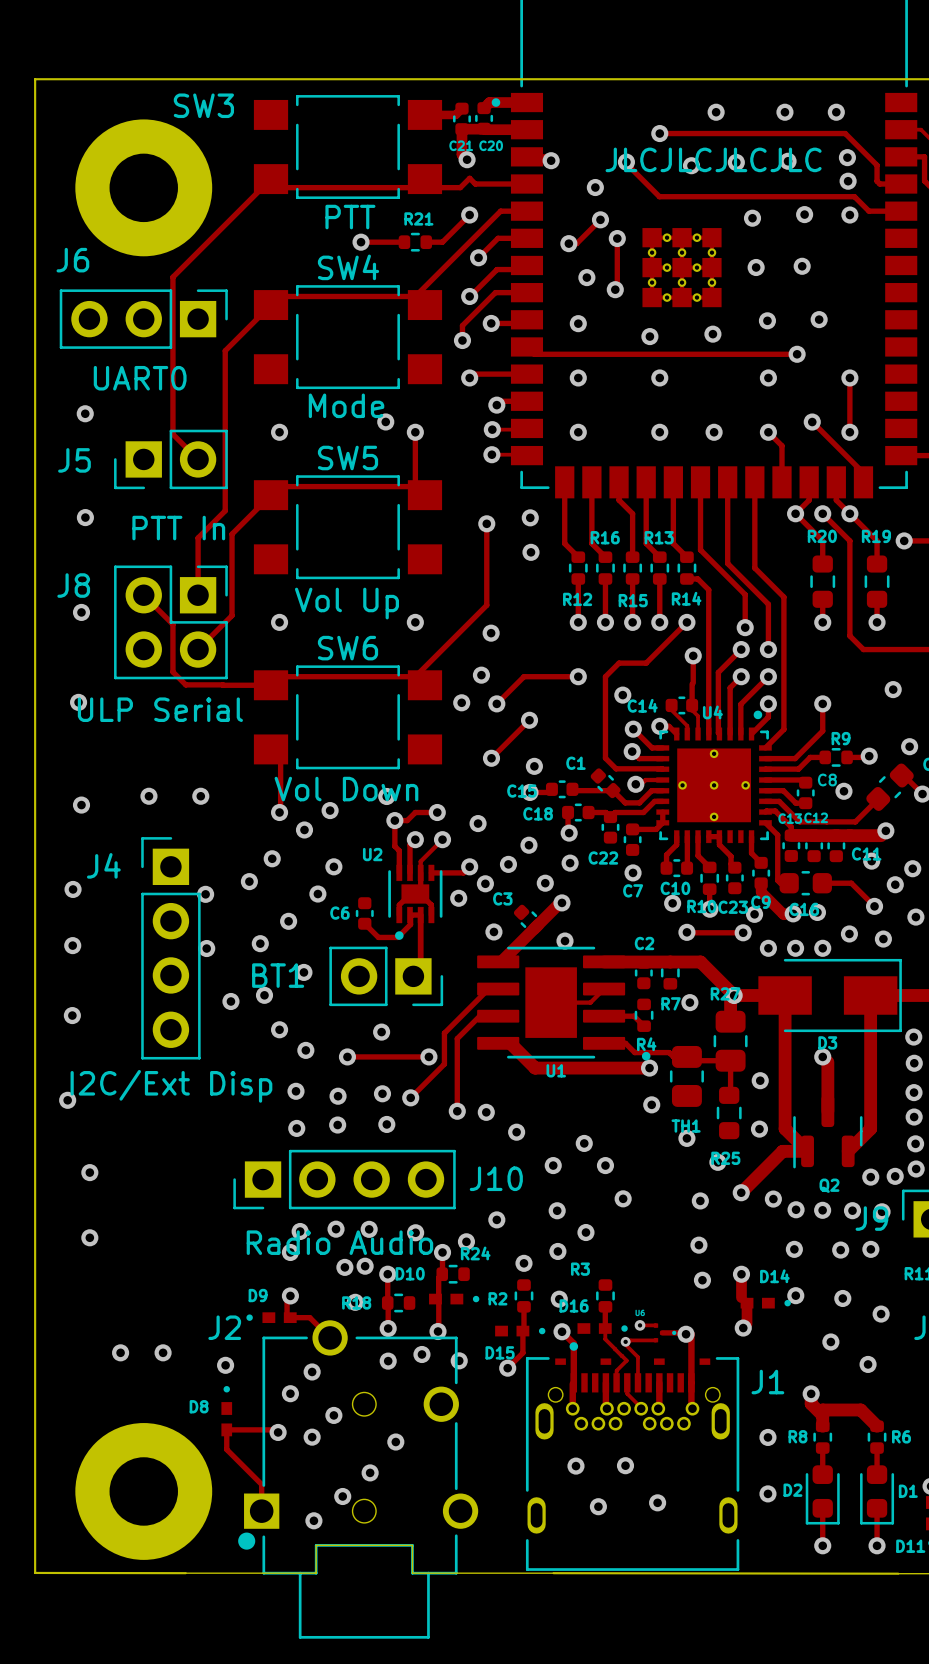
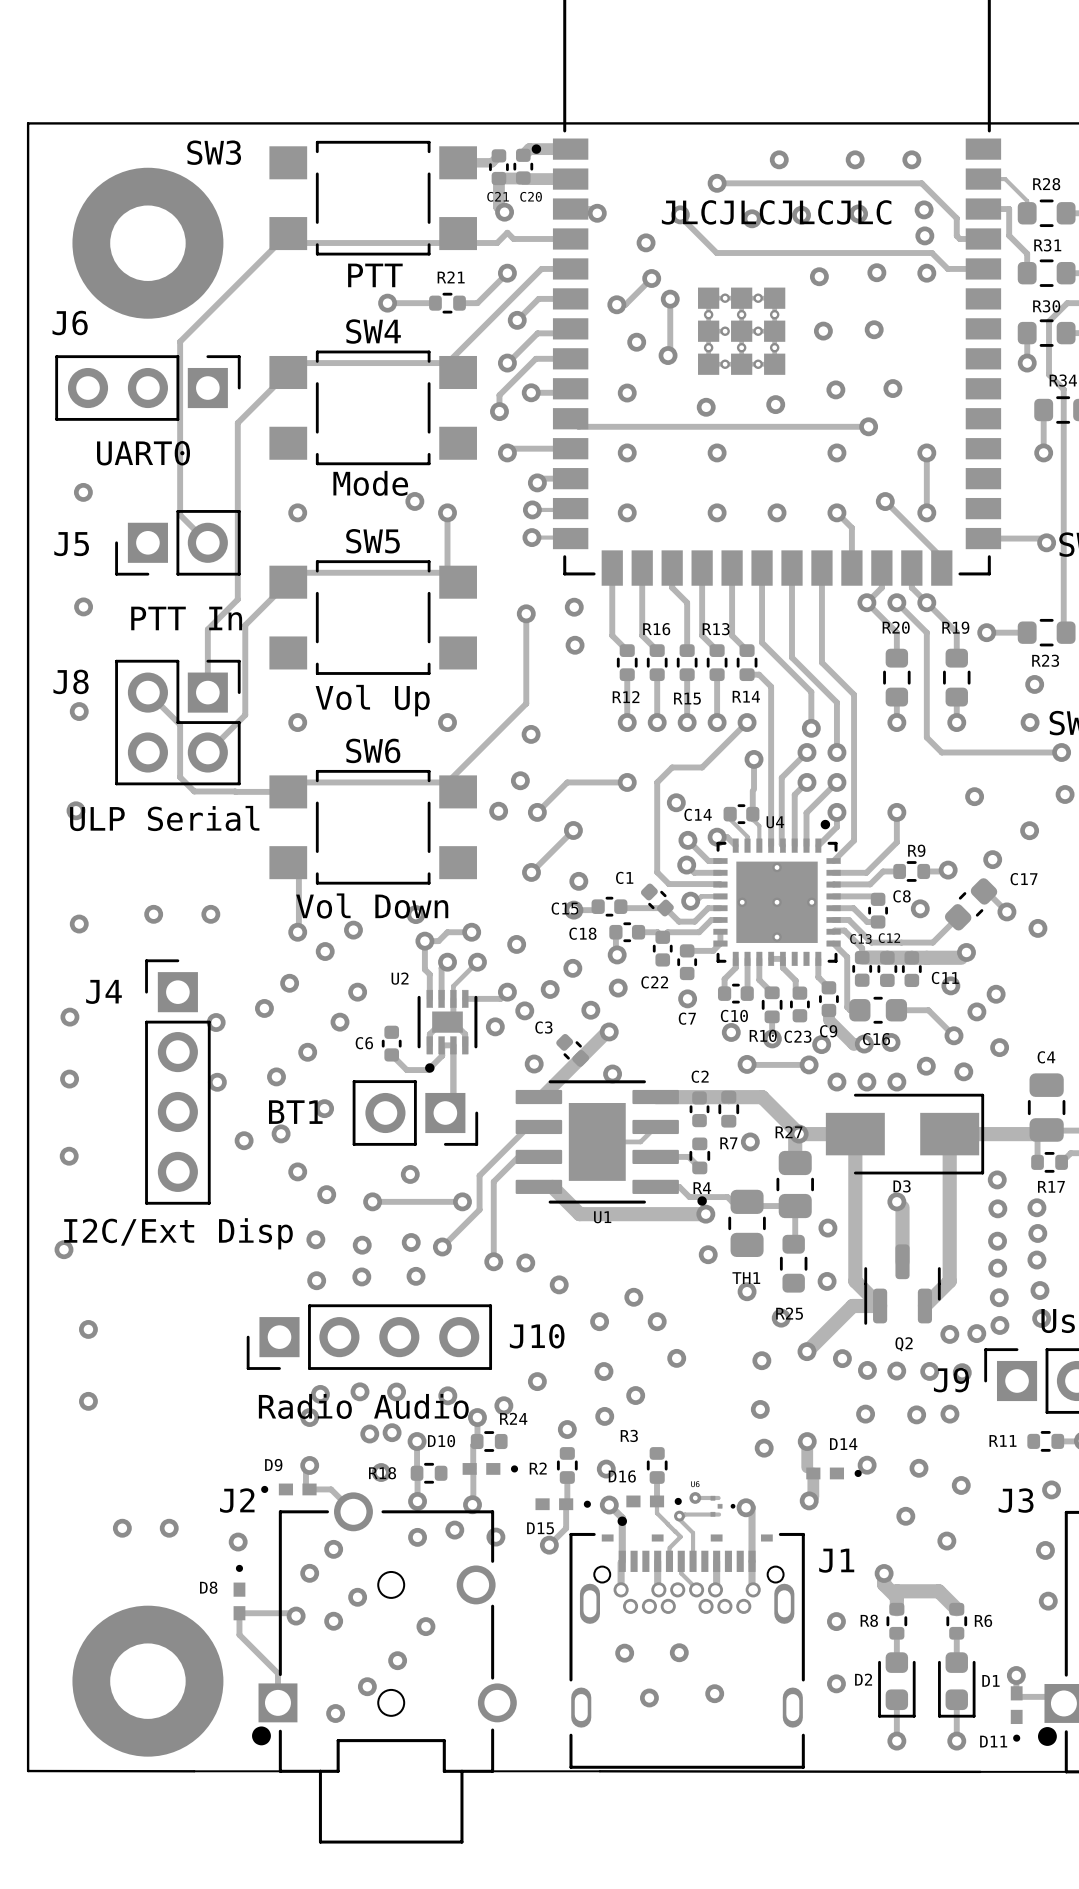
track: none -> (712, 1497) (719, 1498)
track: (662, 1332) (686, 1334) -> none
track: none -> (712, 1514) (719, 1514)

